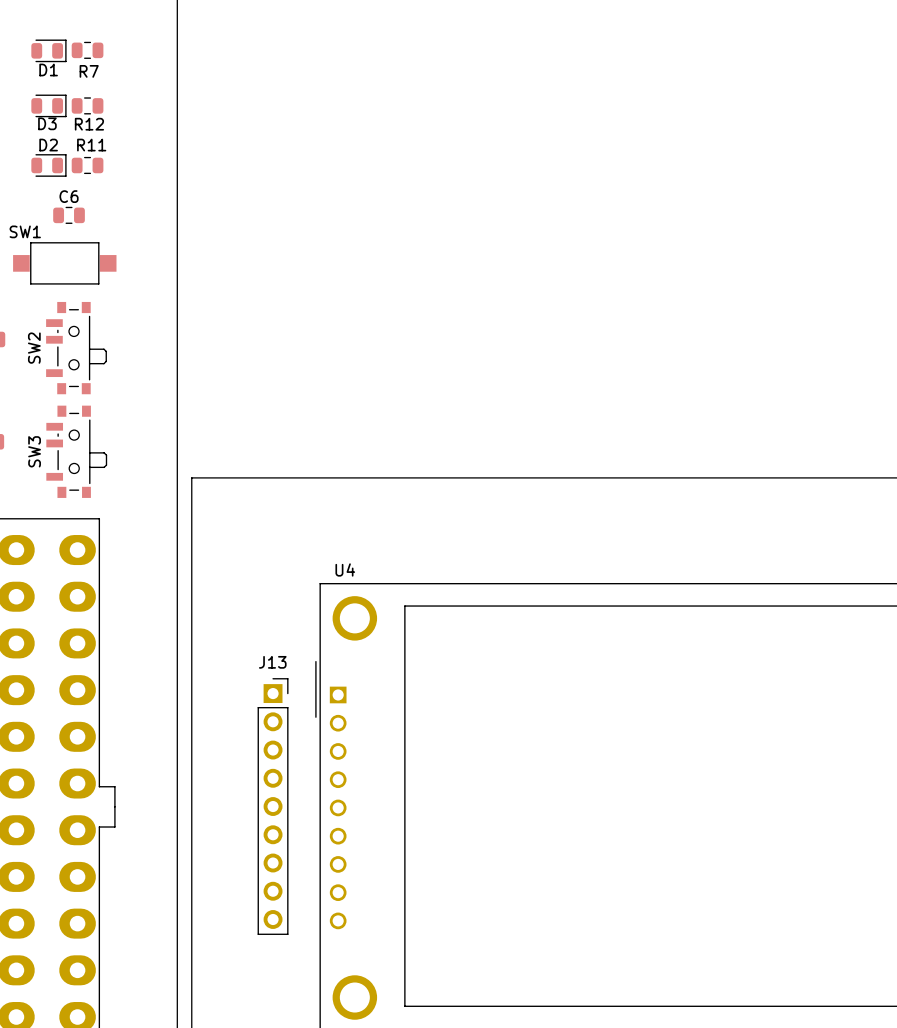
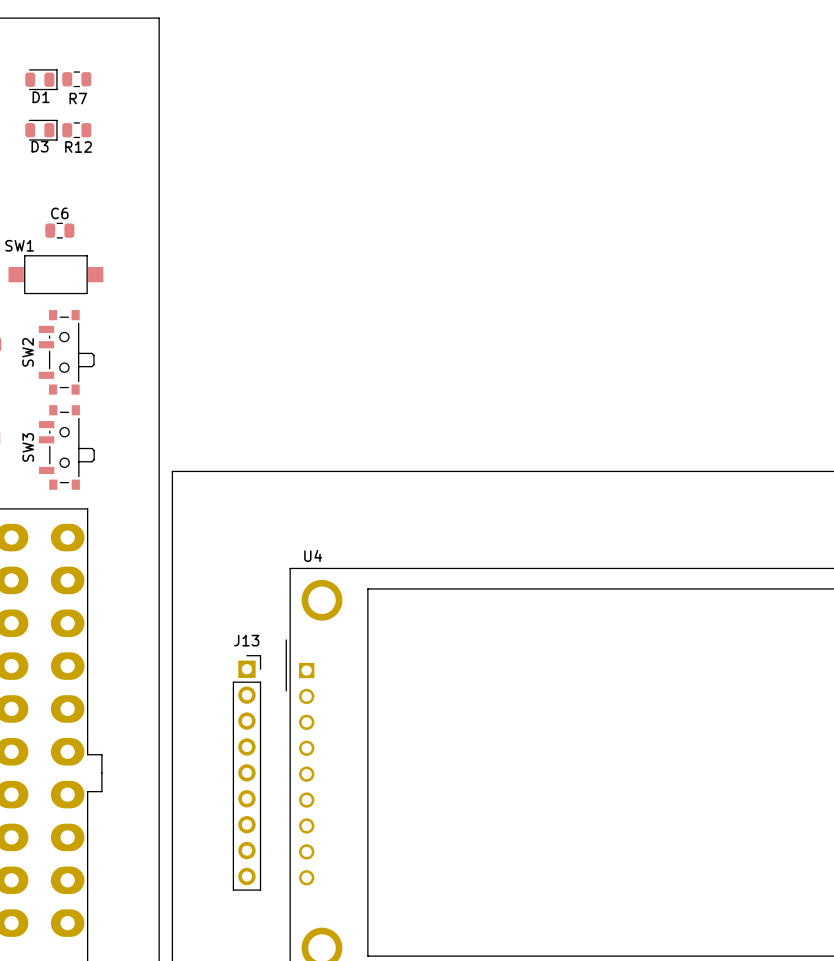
D2: (48, 165) -> none
R11: (87, 165) -> none

